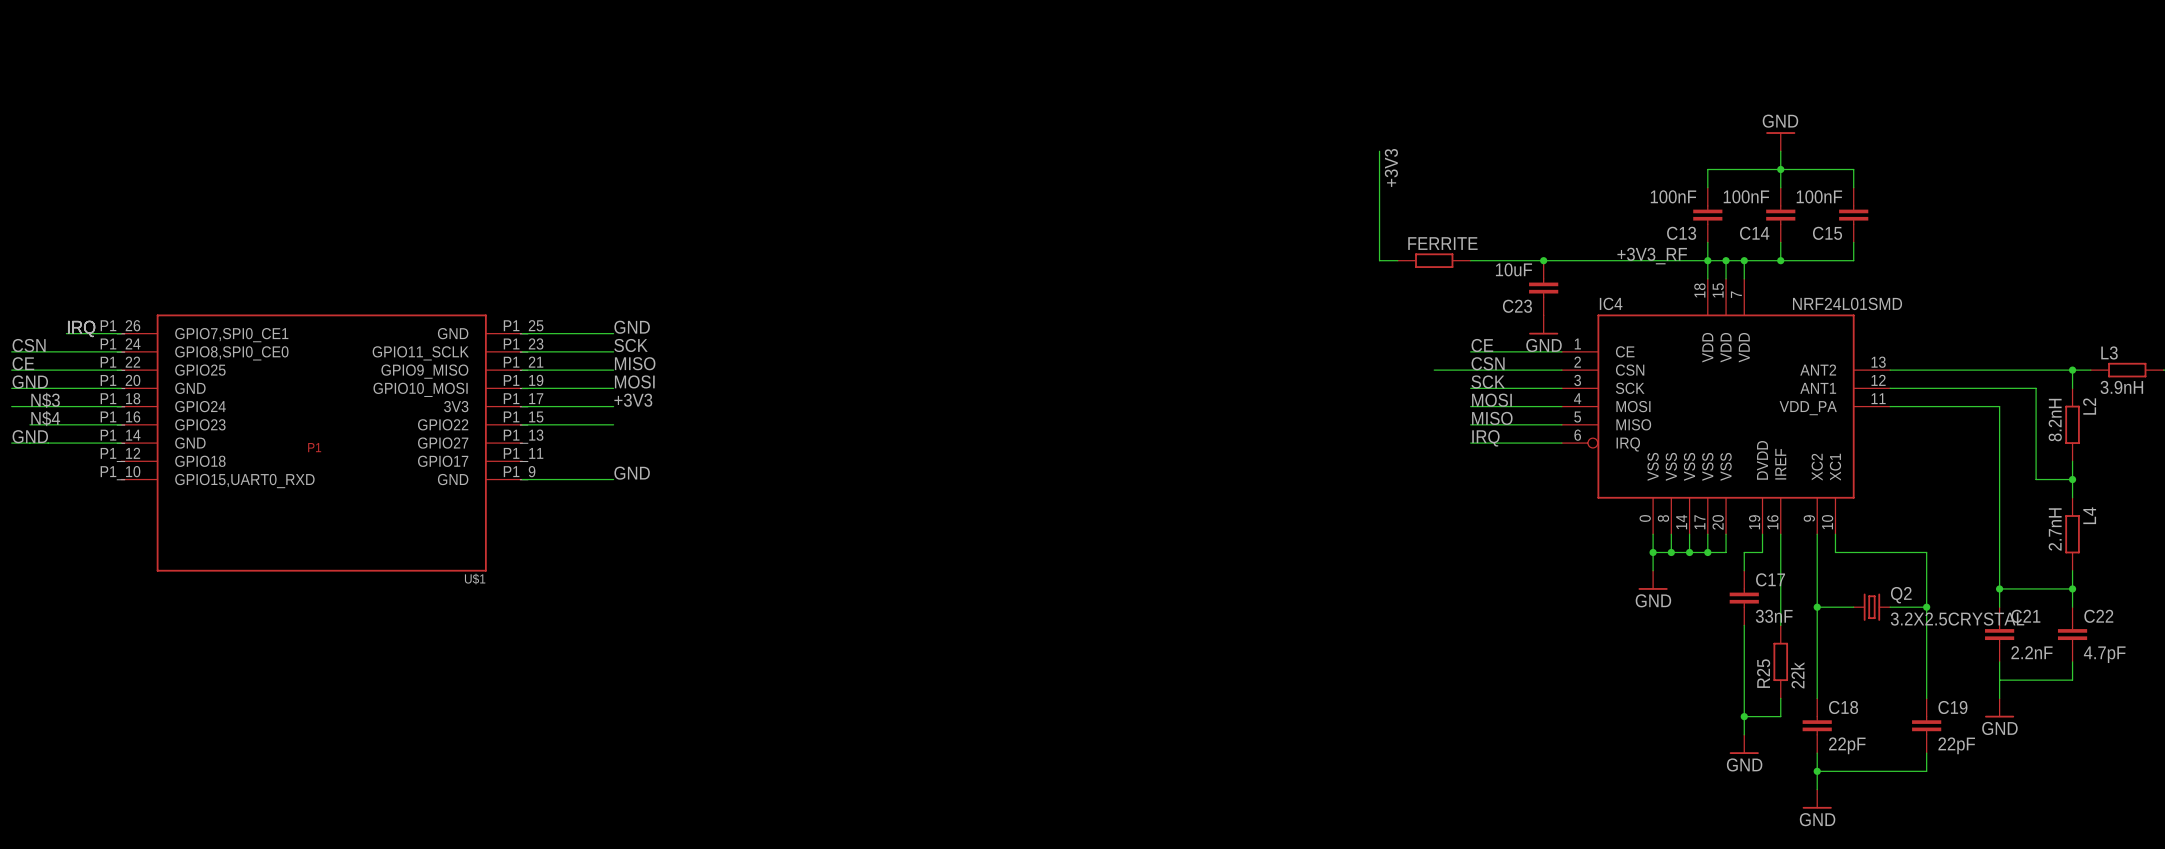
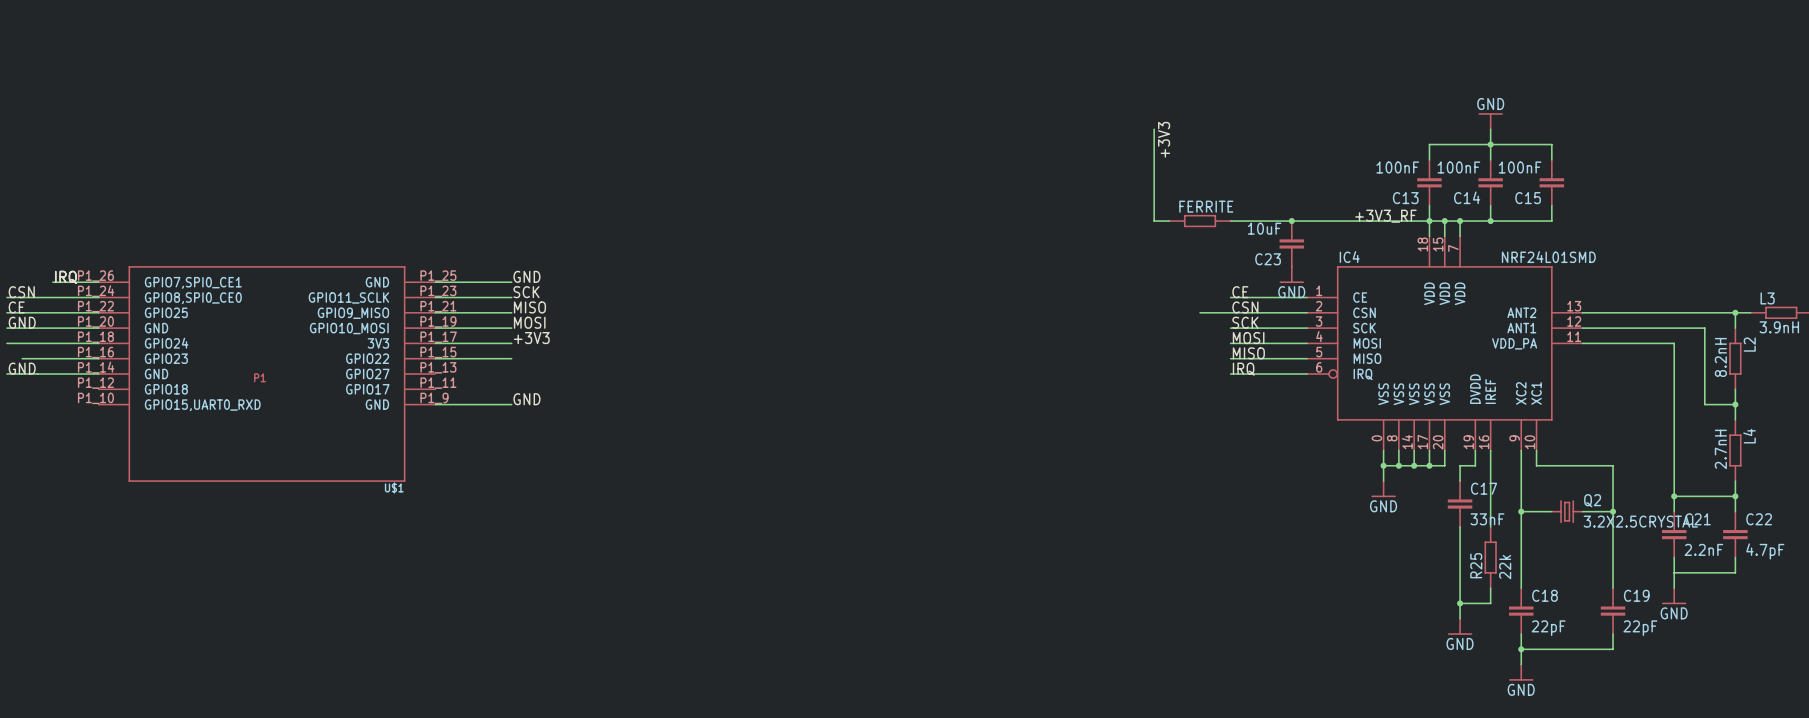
label: N$3 (45, 400) -> none
label: N$4 (45, 418) -> none

